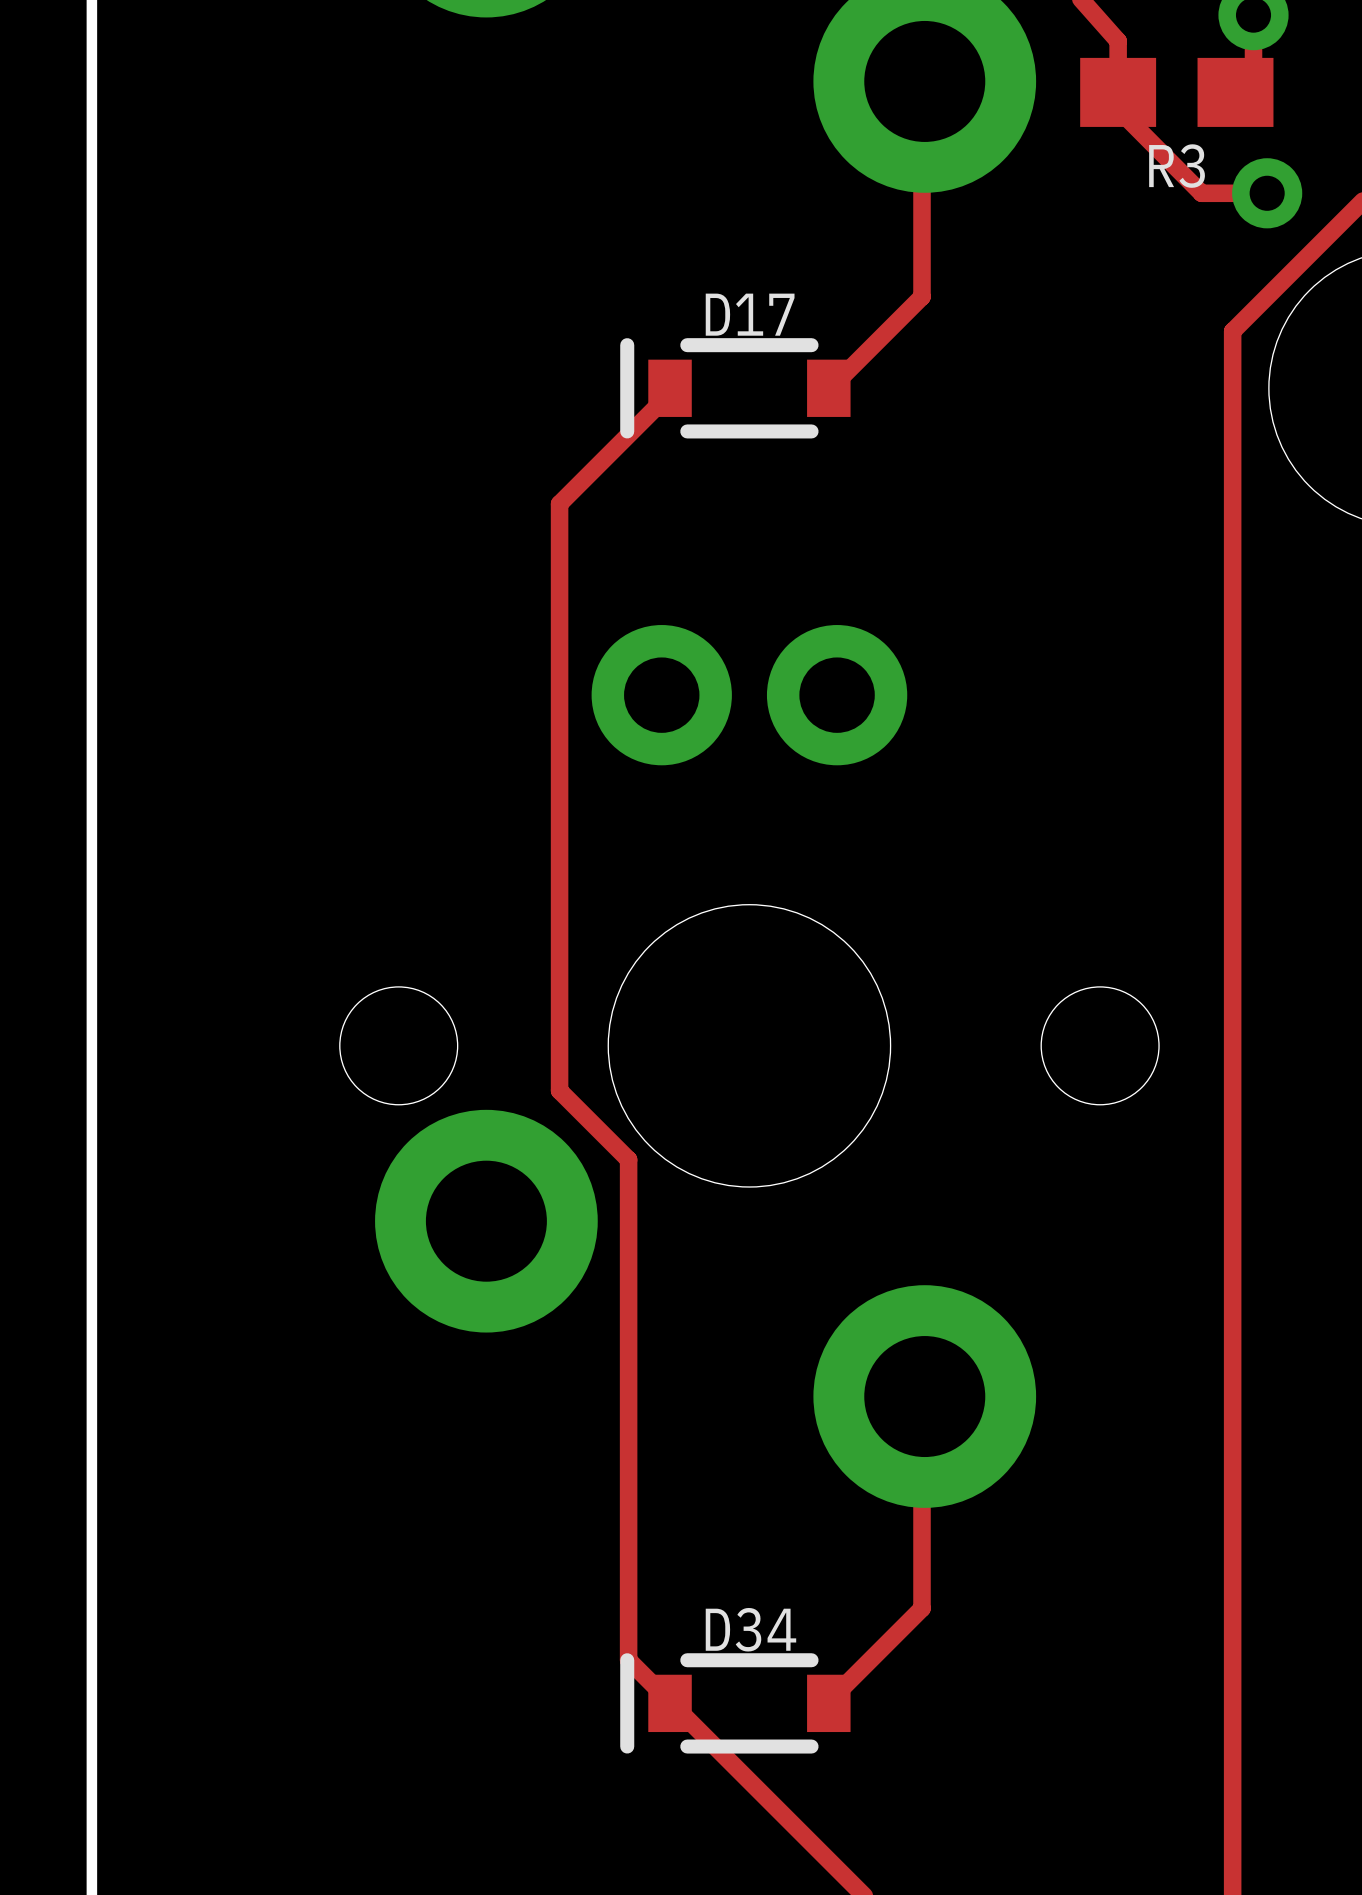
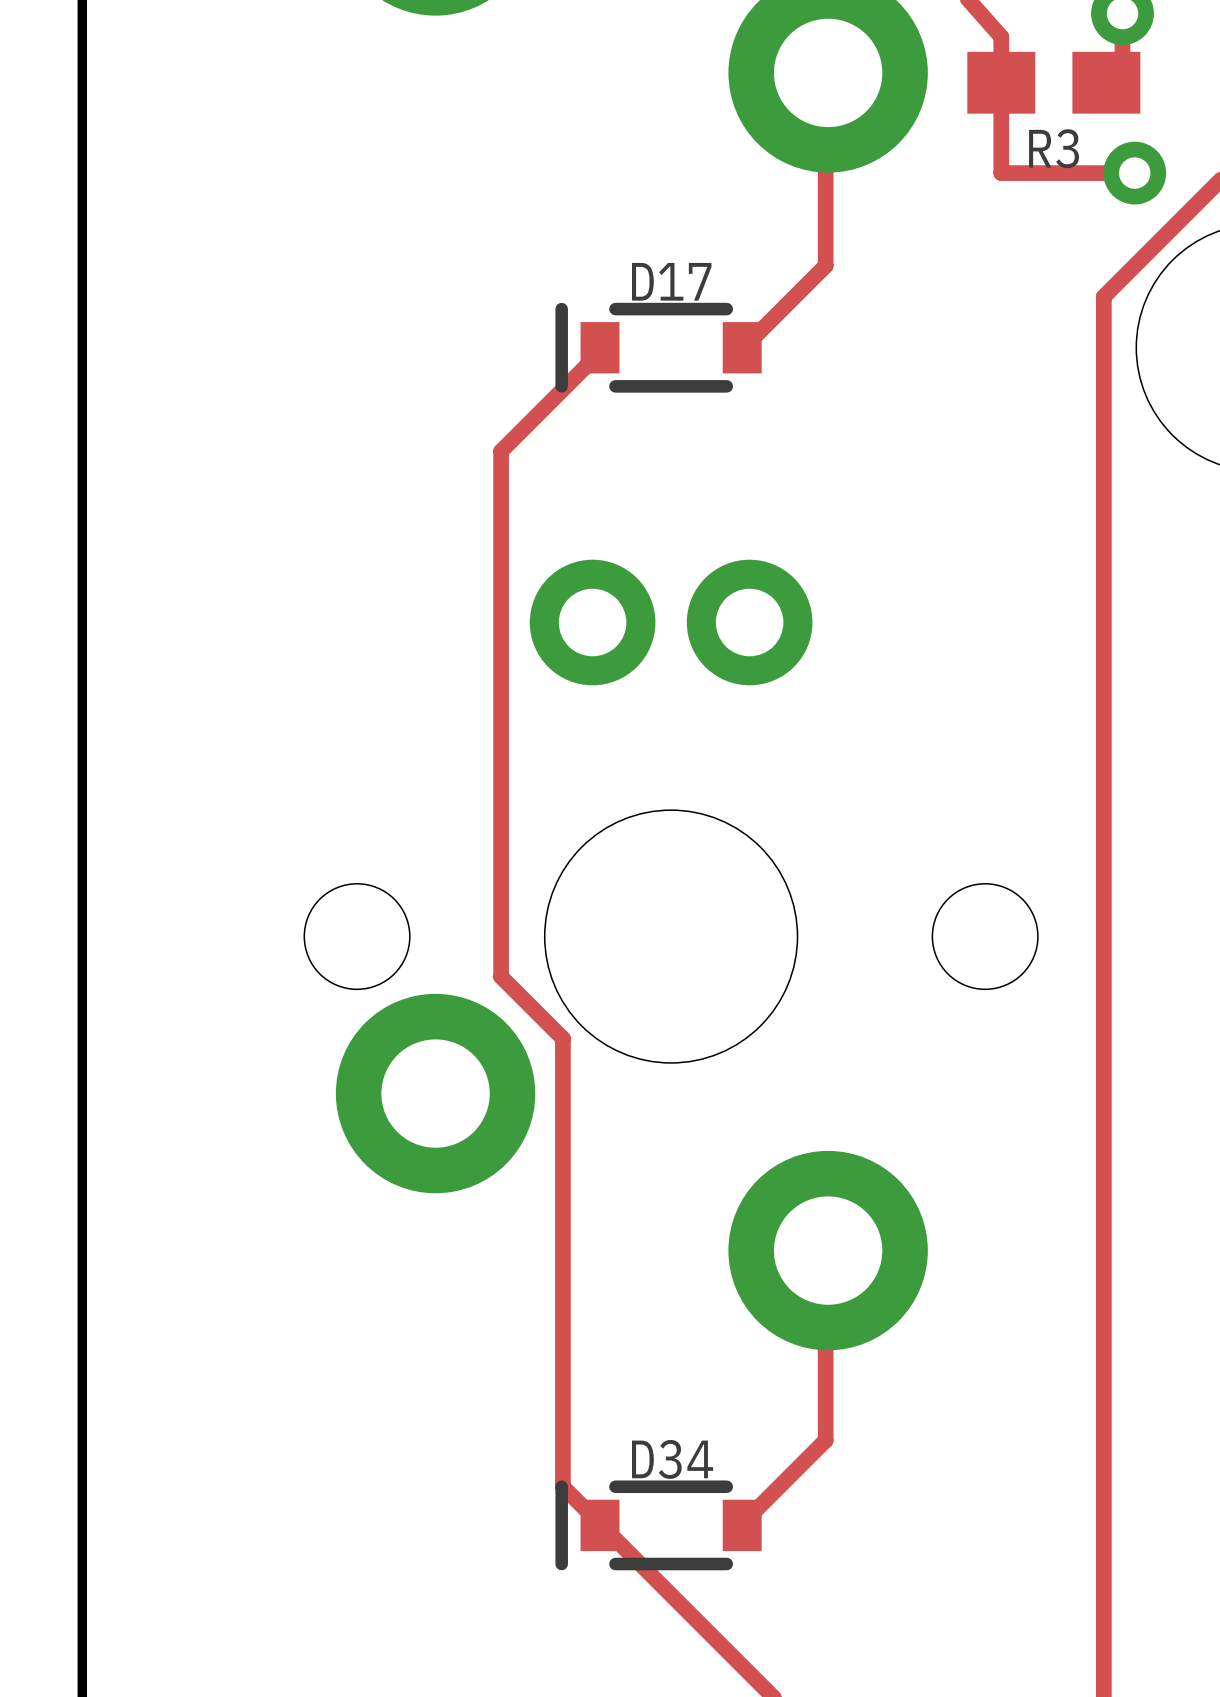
track: (1118, 109) (1201, 193) -> (1001, 97) (1001, 173) (1076, 173)

